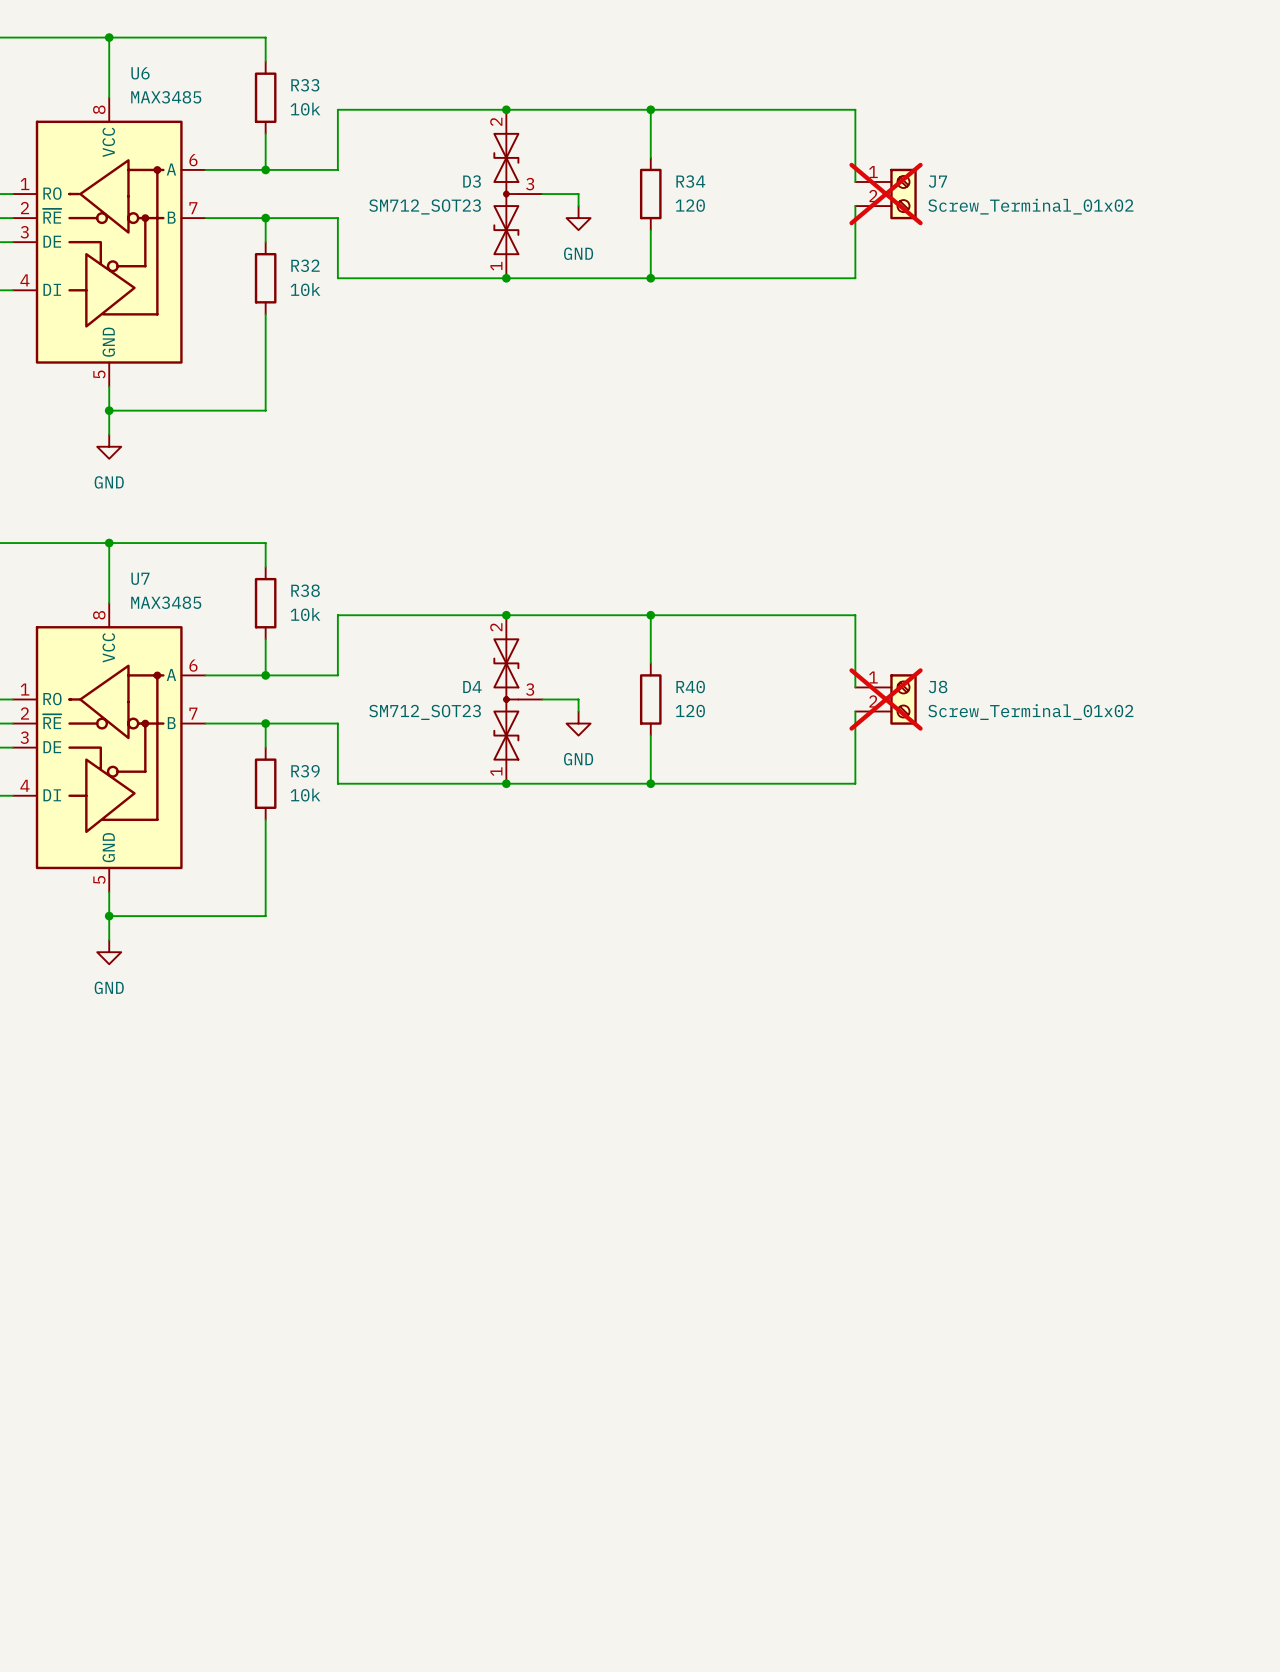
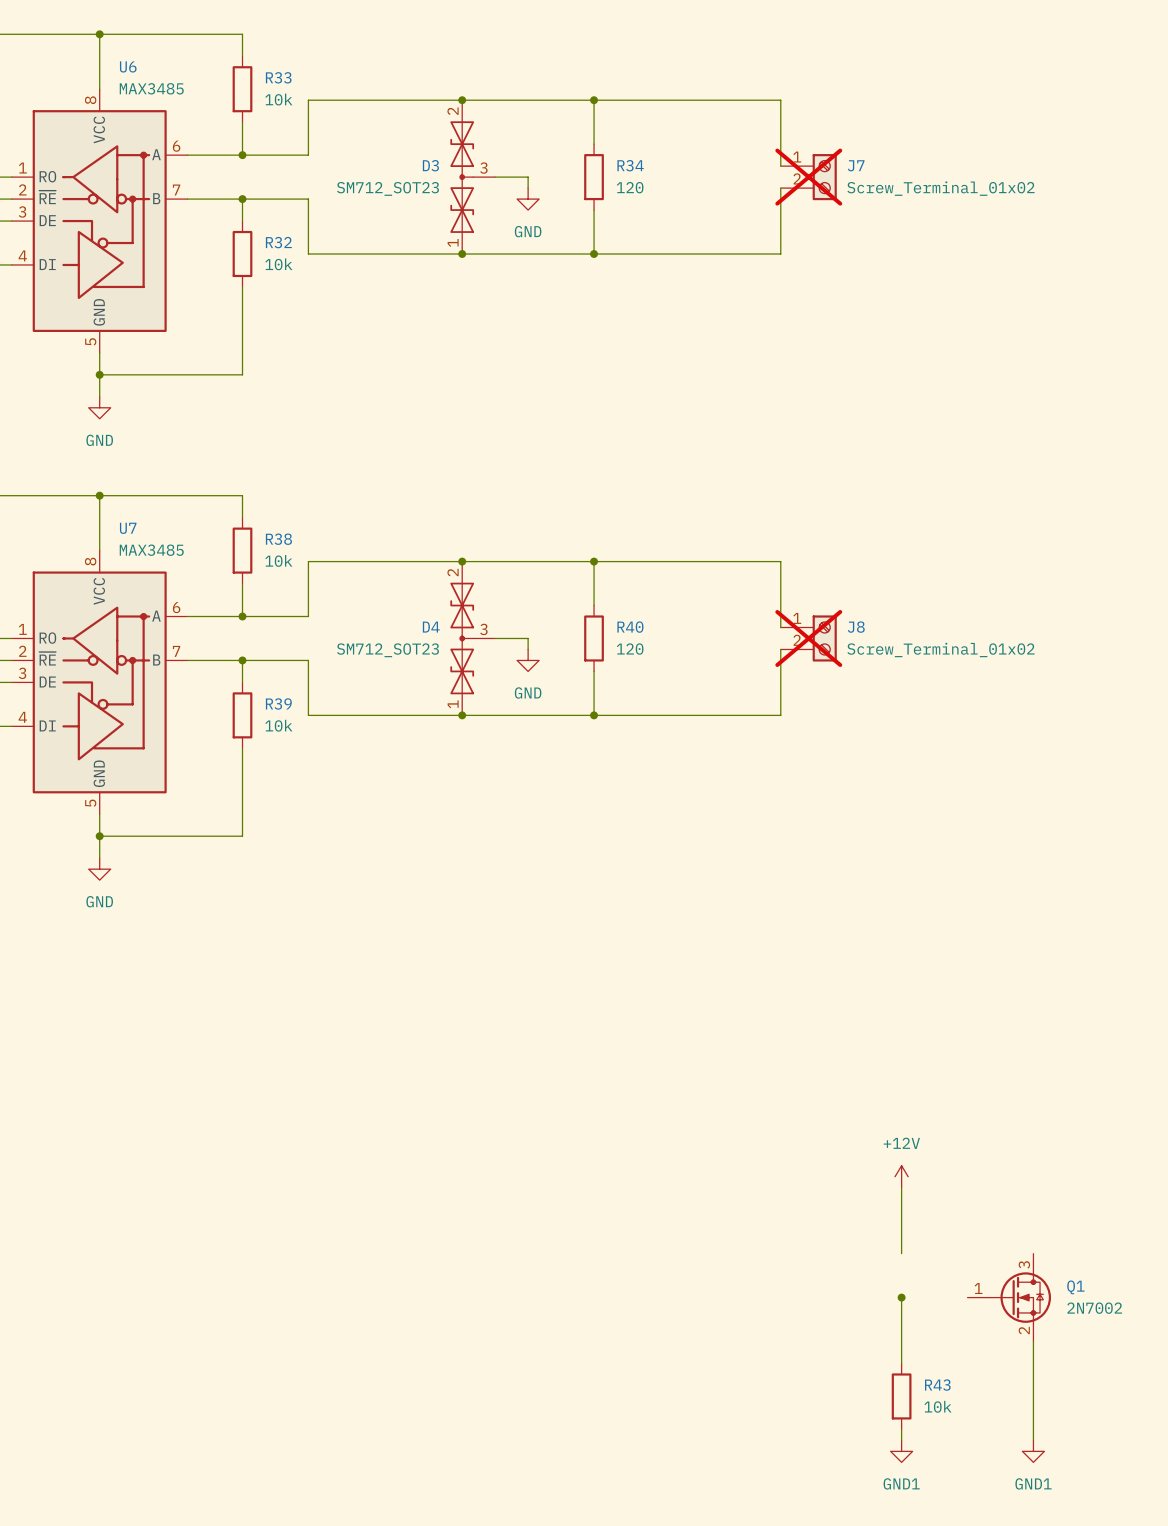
power symbol: none -> +12V (901, 1176)
wire: none -> (901, 1187) (901, 1253)
wire: none -> (901, 1297) (901, 1363)
junction: none -> (901, 1297)
Q1: none -> 2N7002 (1009, 1297)
wire: none -> (1033, 1341) (1033, 1440)
R43: none -> 10k (901, 1396)
wire: none -> (901, 1429) (901, 1440)
power symbol: none -> GND1 (901, 1451)
power symbol: none -> GND1 (1033, 1451)

